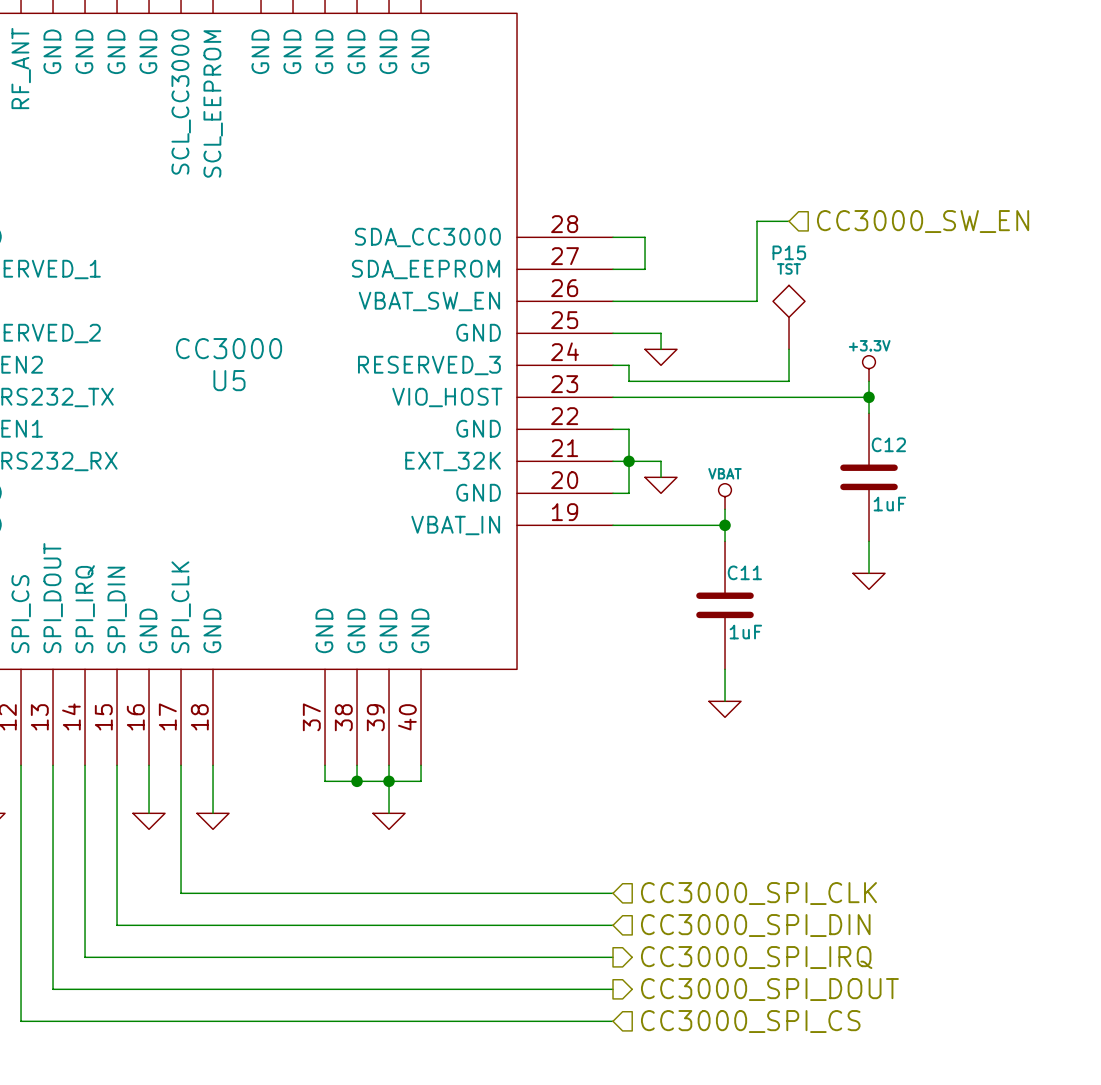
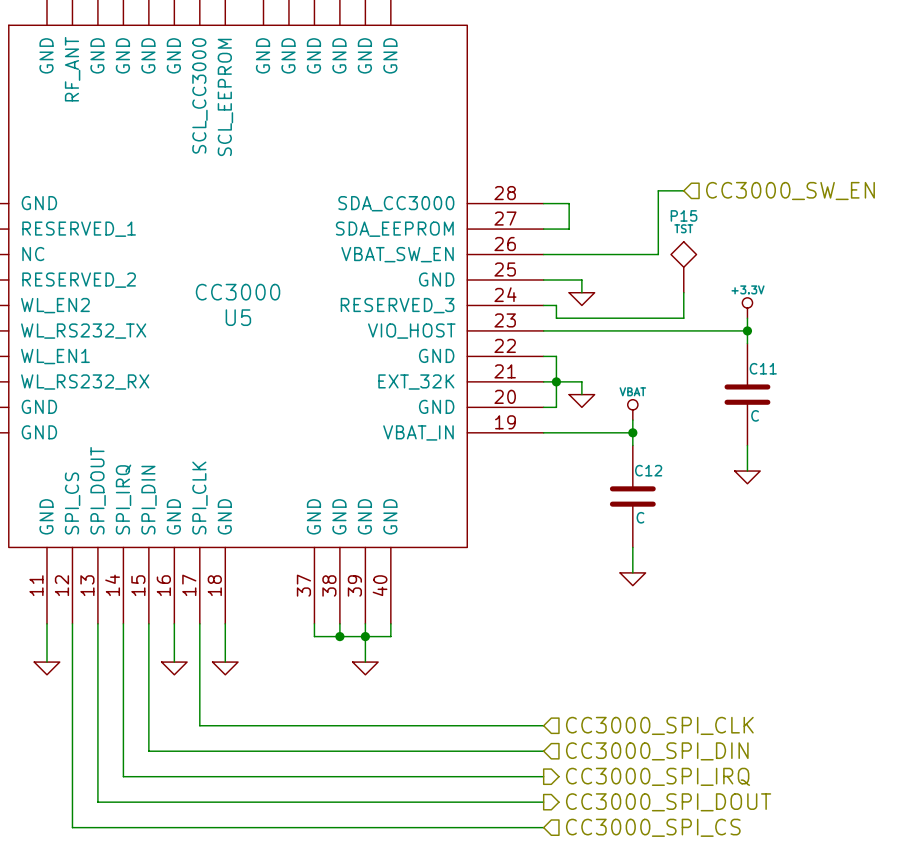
C12 name: C12 (888, 444) -> C11 (763, 368)
C12 value: 1uF (889, 504) -> C (755, 415)
C11 name: C11 (744, 572) -> C12 (648, 470)
C11 value: 1uF (745, 632) -> C (640, 517)

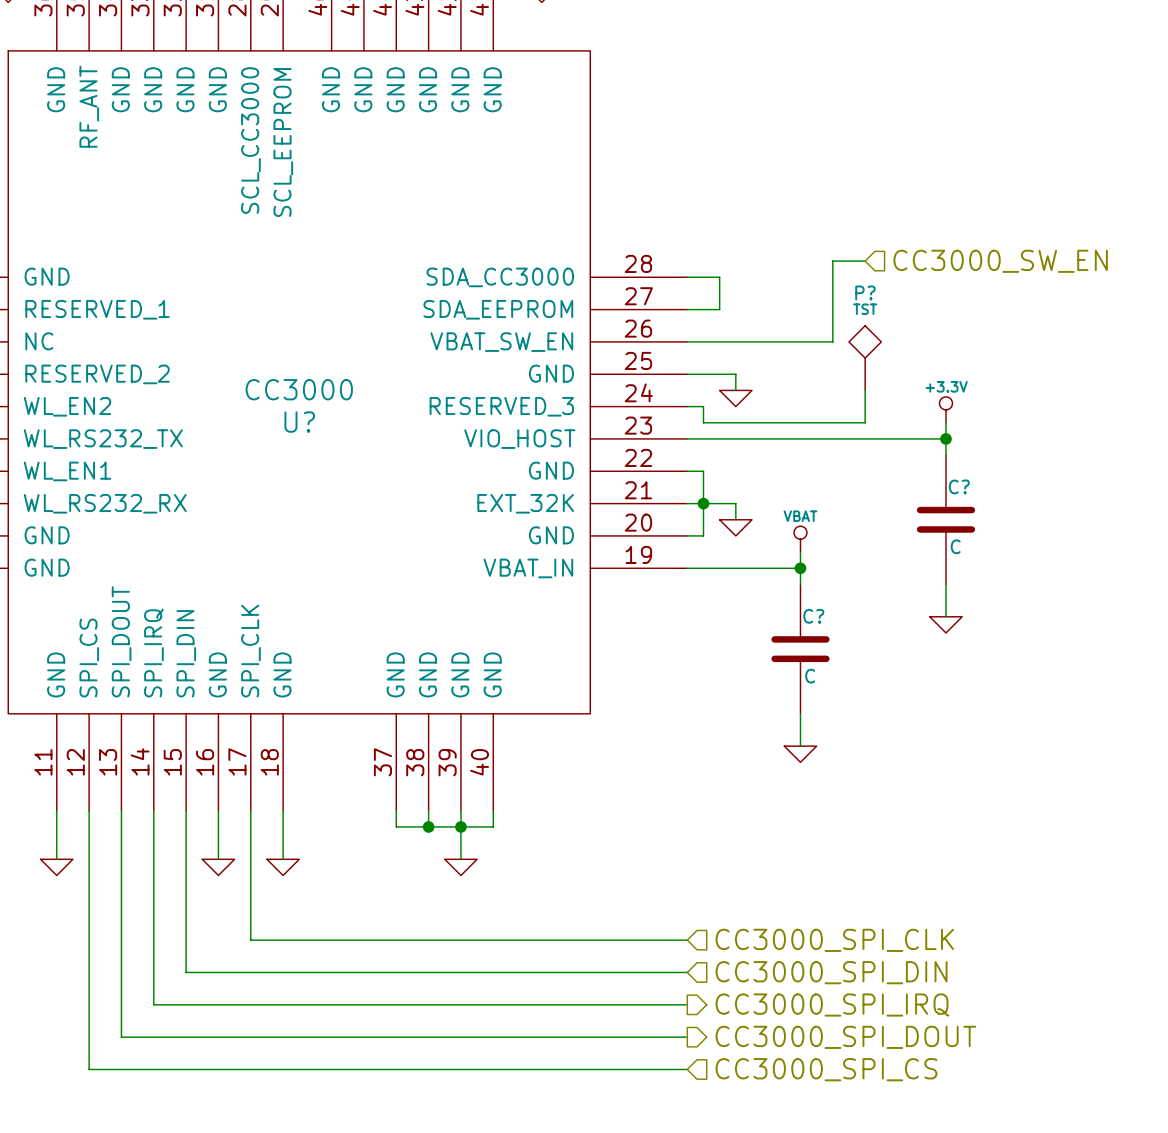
P15 name: P15 (684, 215) -> P? (865, 292)
U5 name: U5 (238, 317) -> U? (299, 422)
C11 name: C11 (763, 368) -> C? (959, 486)
C12 name: C12 (648, 470) -> C? (813, 616)

